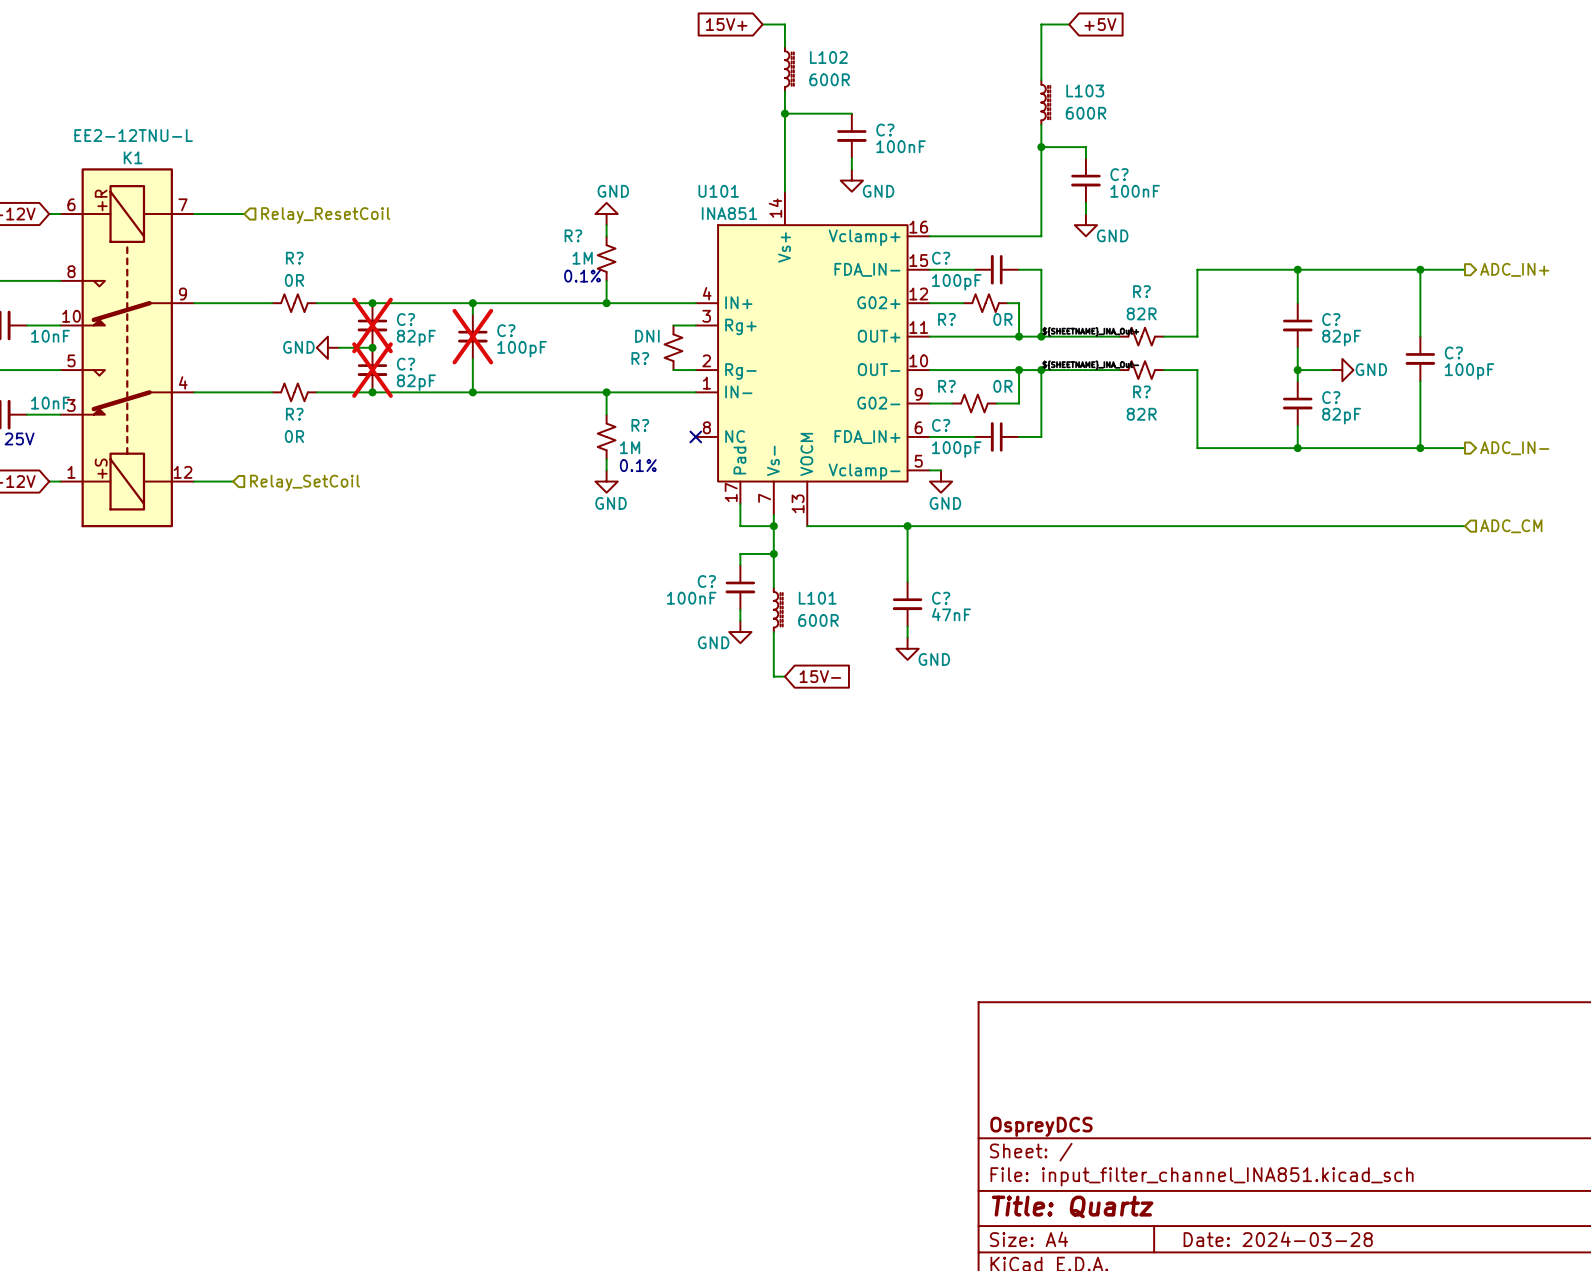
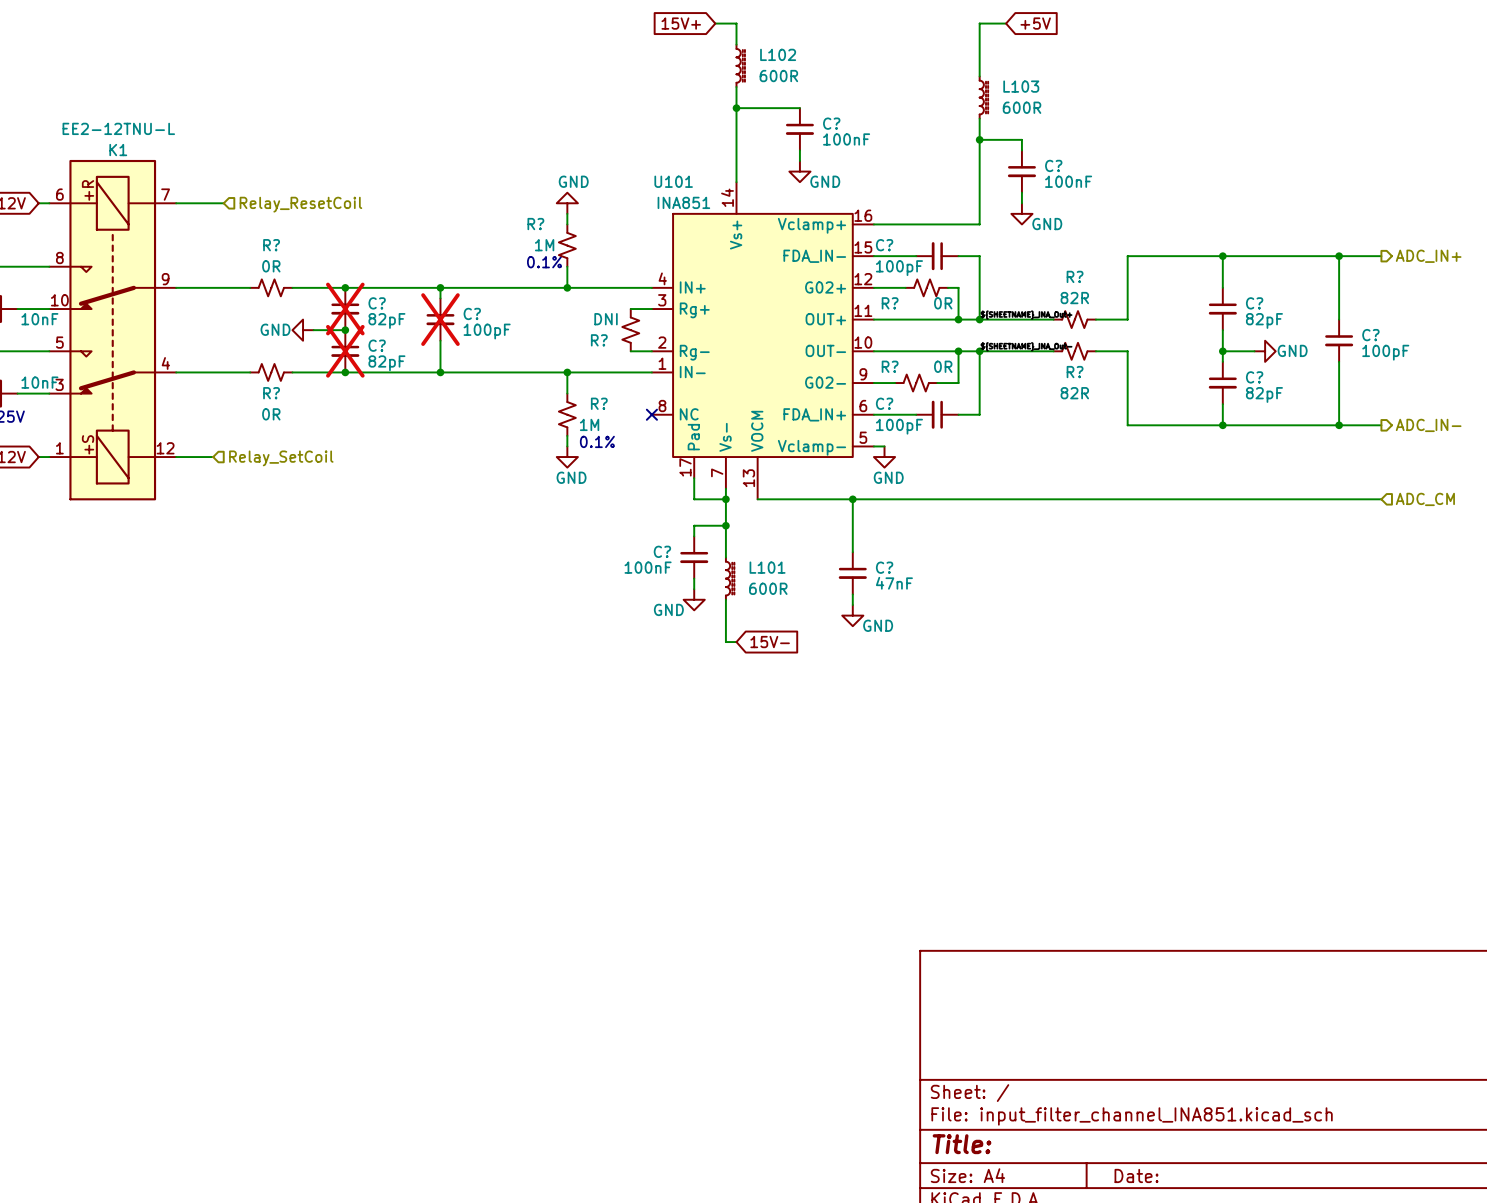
title block: OspreyDCS (1041, 1126) -> none
title block: Title: Quartz (1072, 1206) -> Title: (962, 1144)
title block: Date: 2024-03-28 (1278, 1239) -> Date: (1136, 1175)

